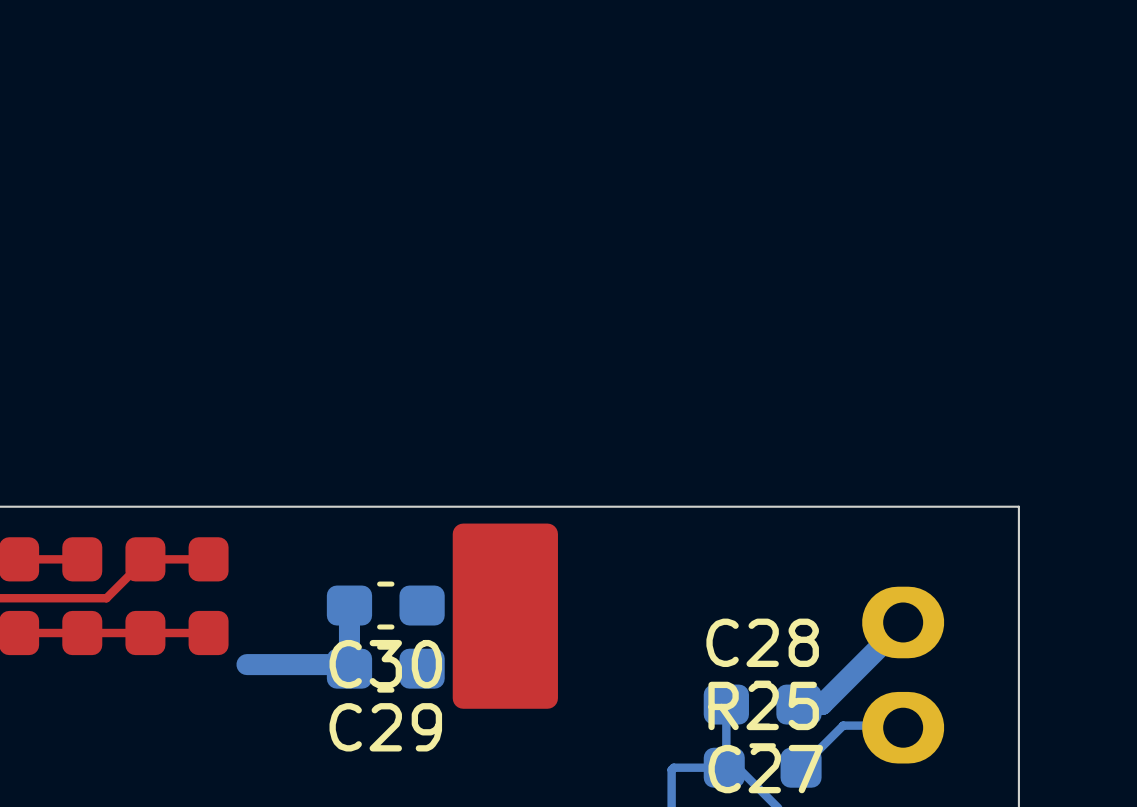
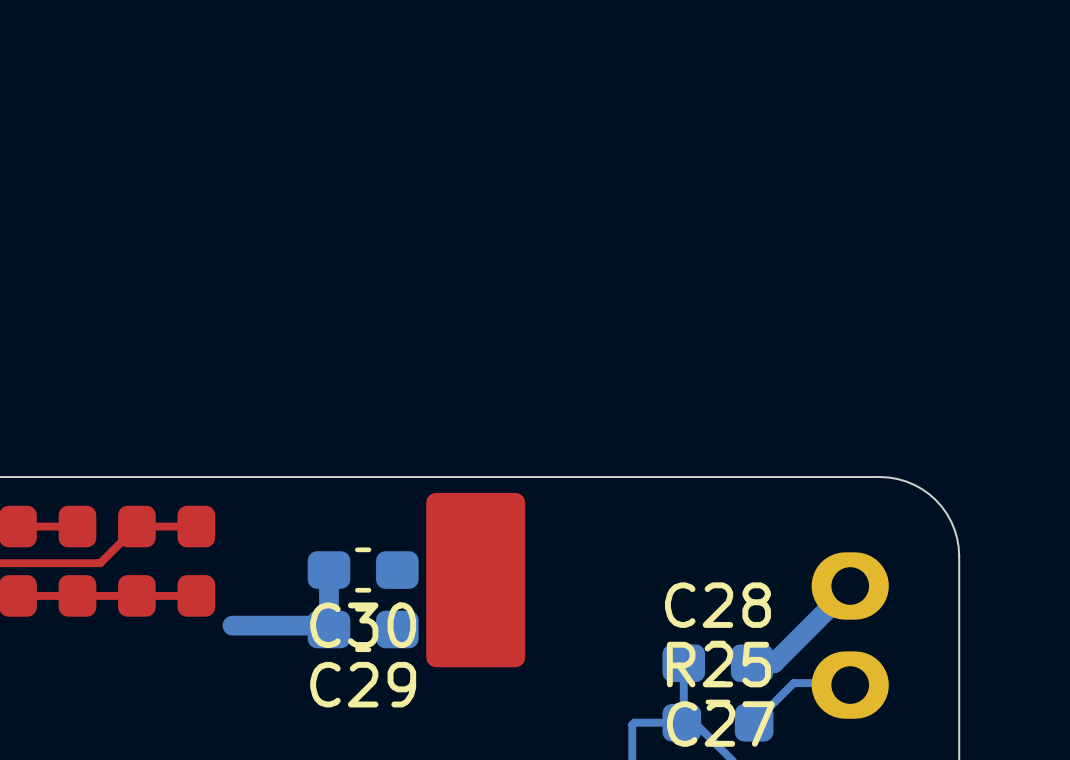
board edge: (934, 506) (1018, 506) (1018, 590) -> (879, 477) (897, 479) (914, 484) (935, 500) (951, 521) (957, 538) (959, 556)

